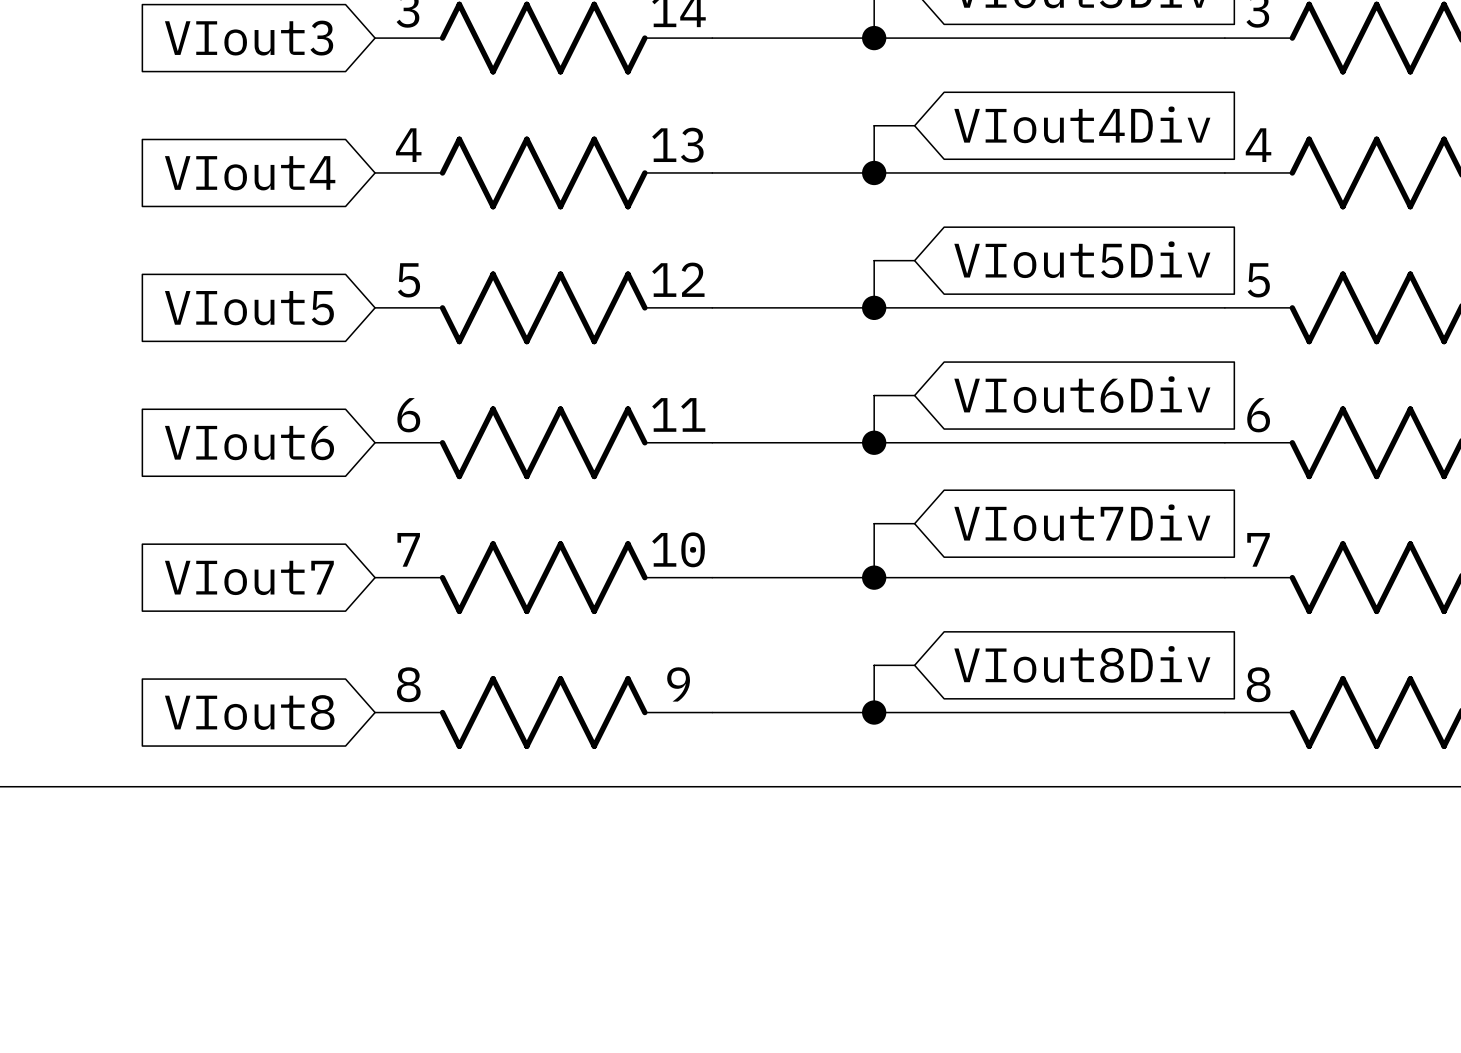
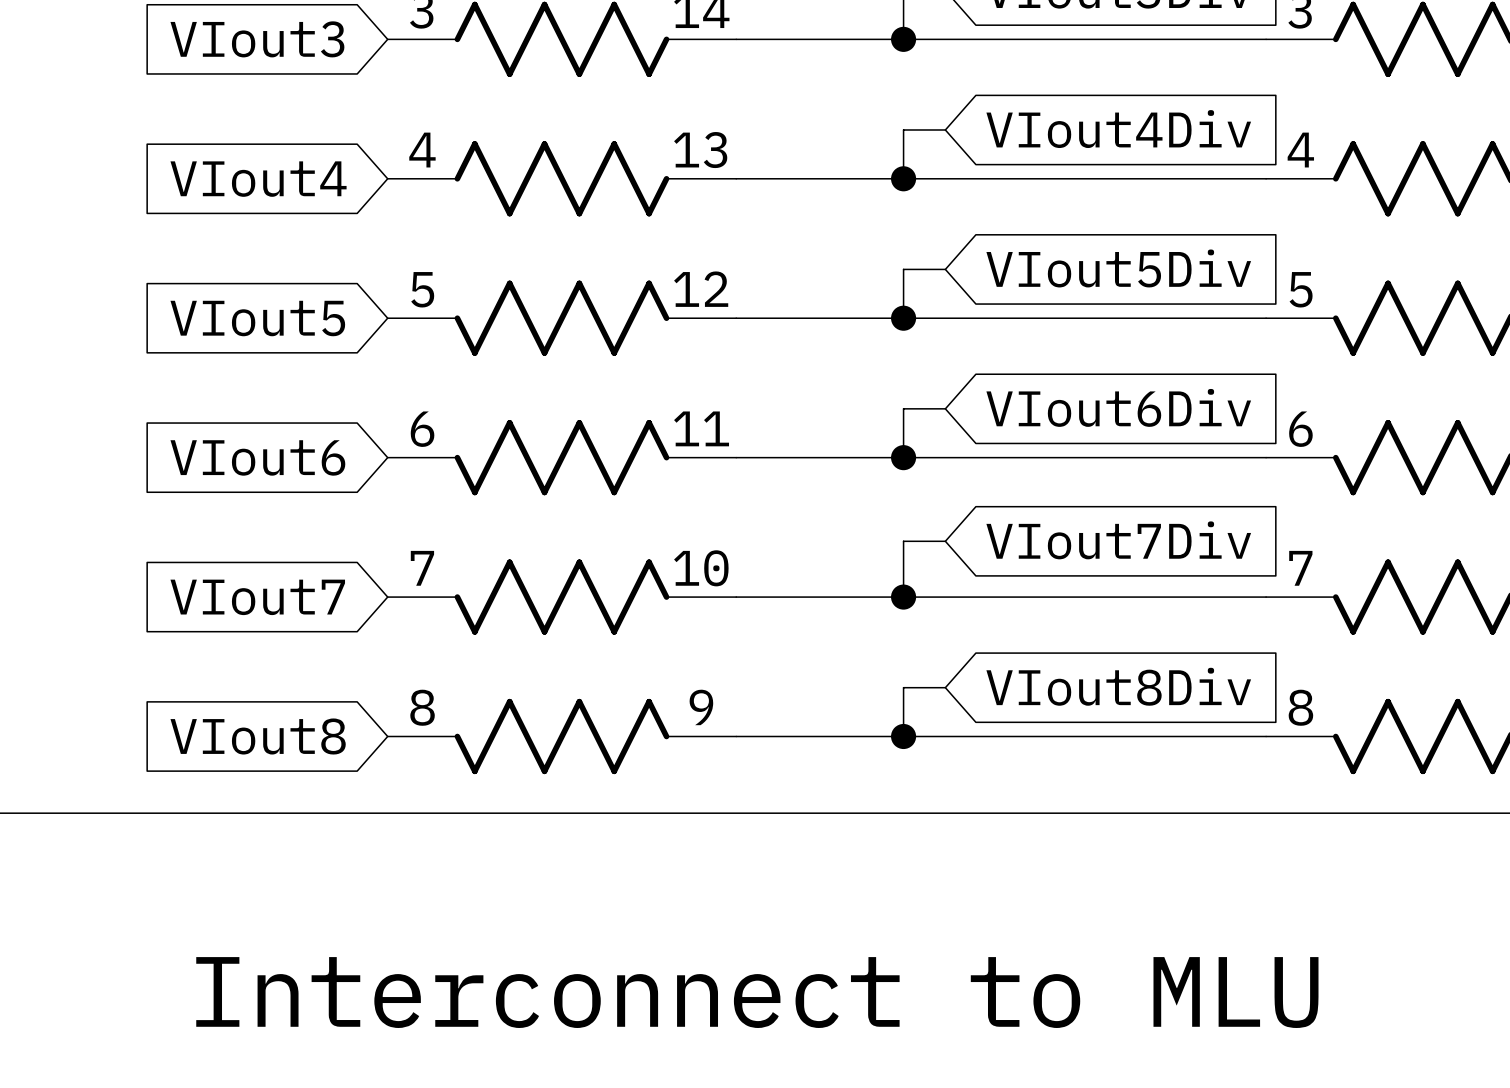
text: none -> Interconnect to MLU (757, 992)

